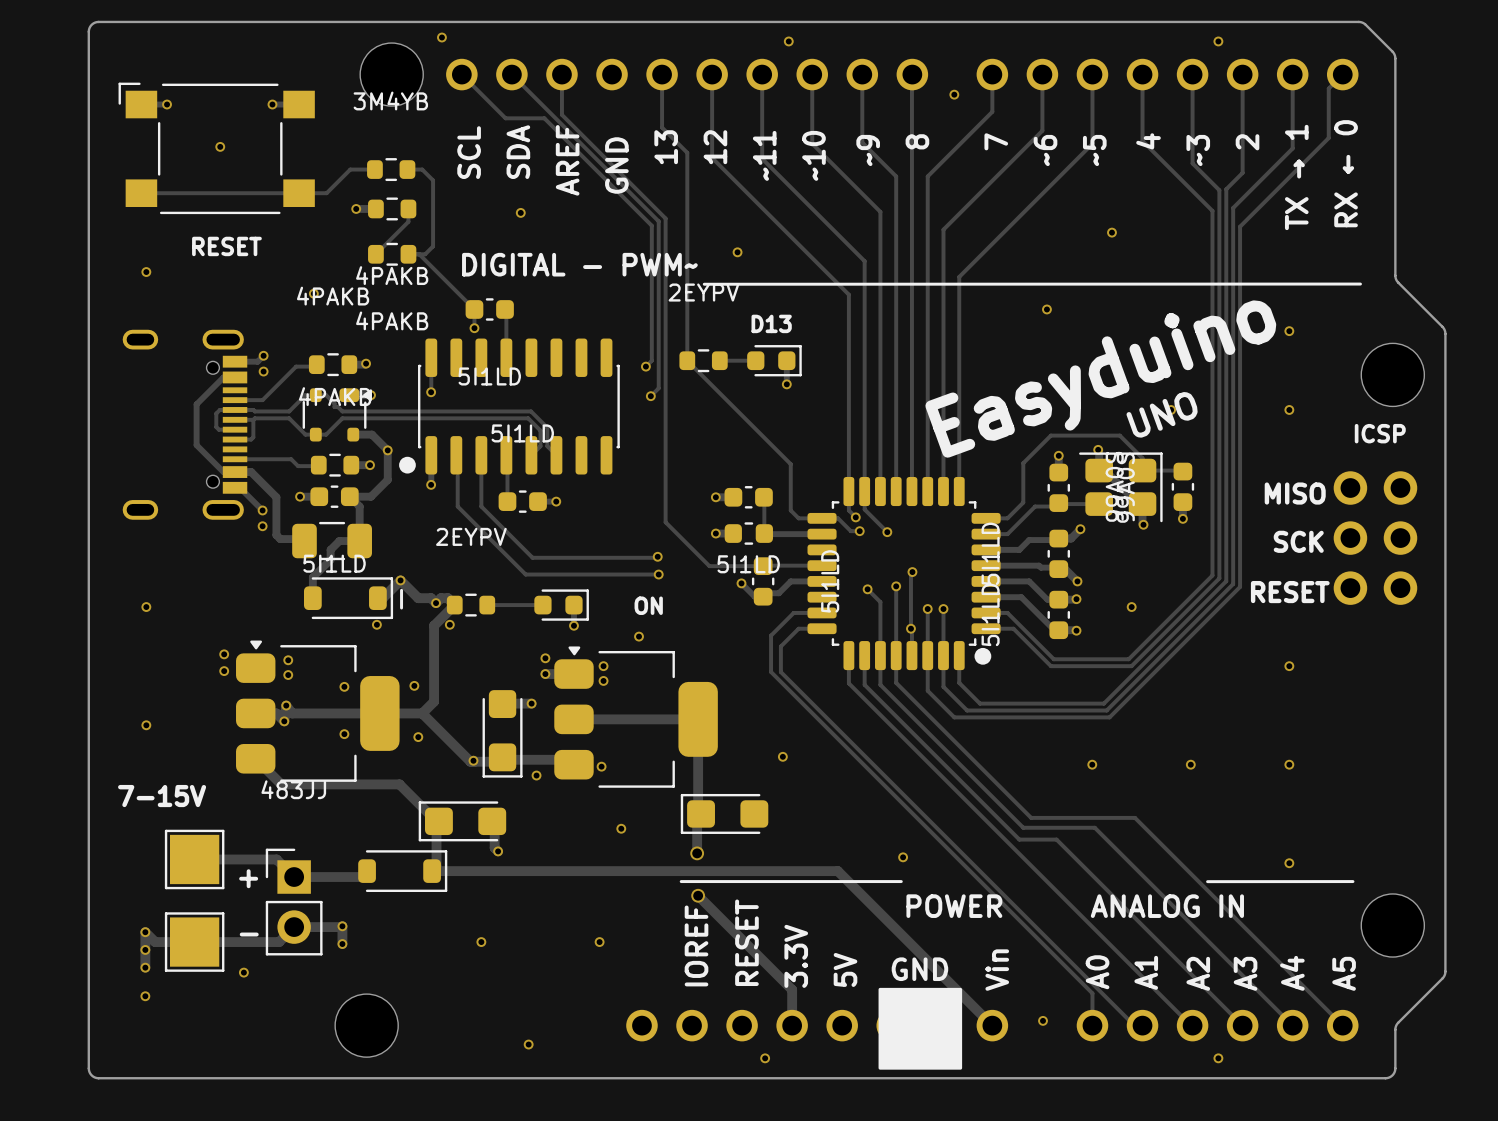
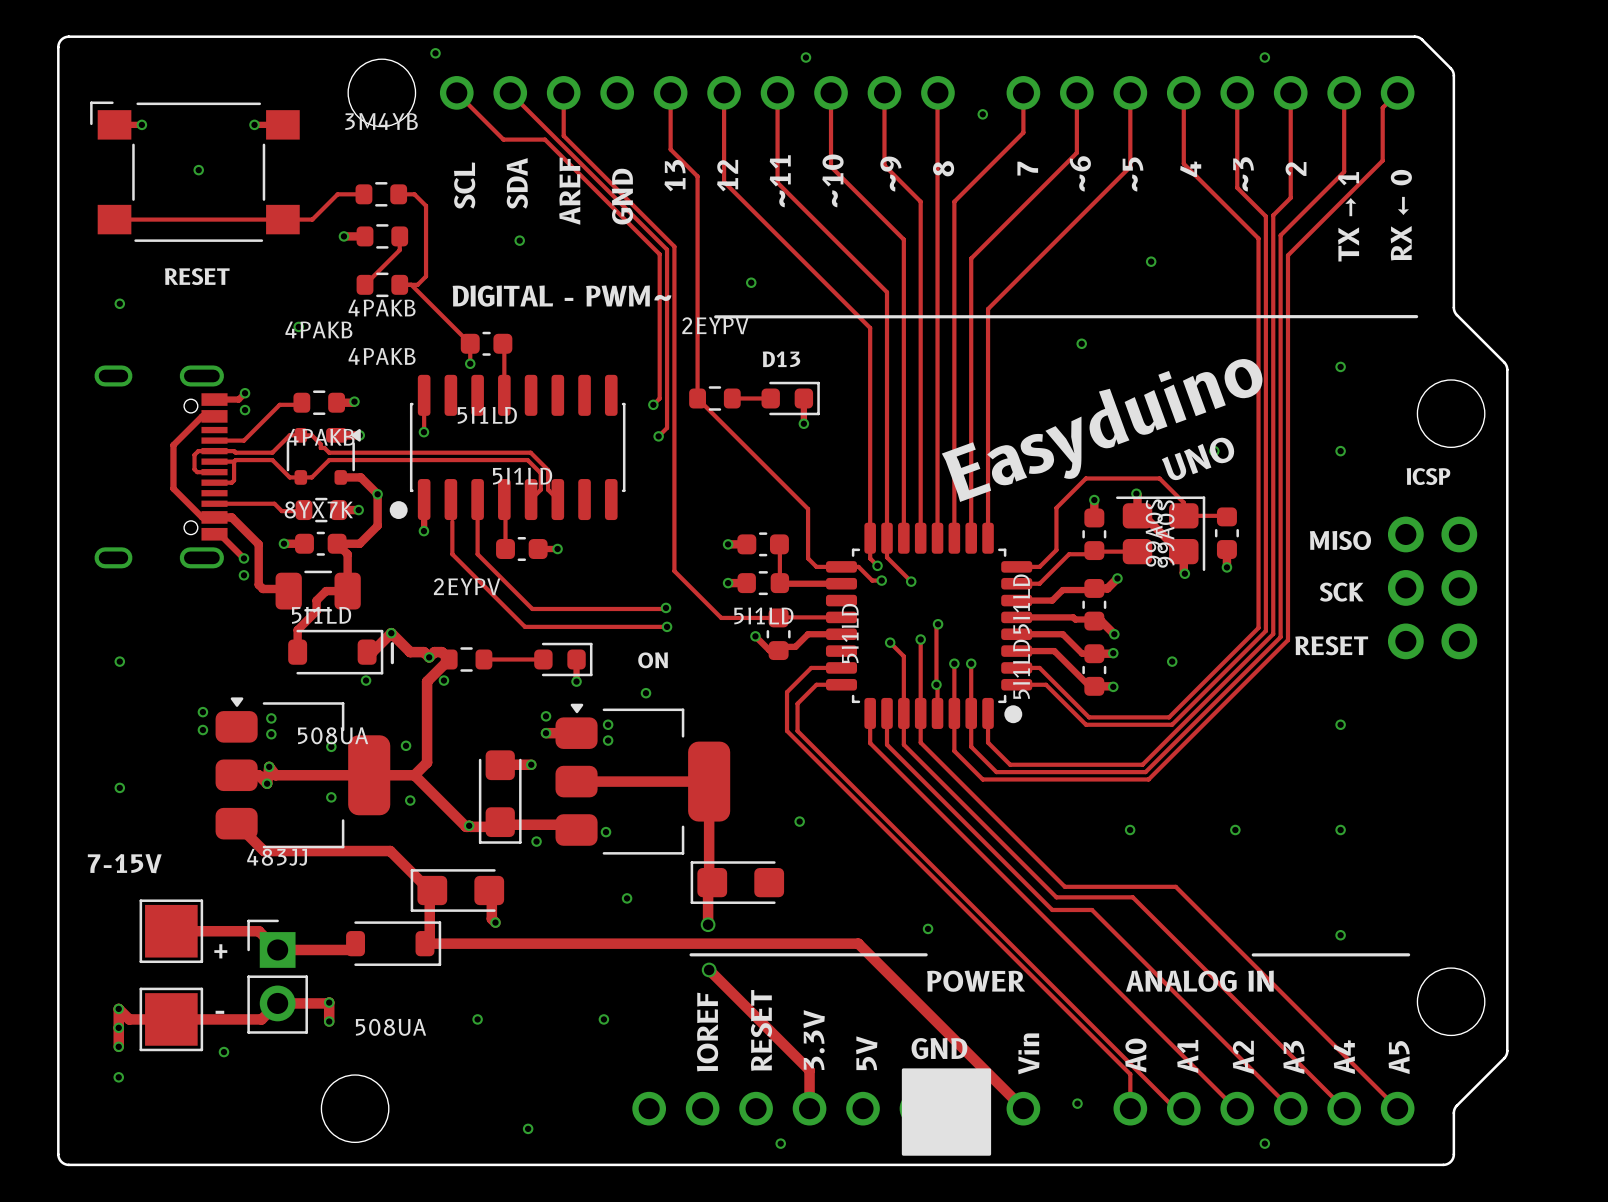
part text: none -> 8YX7K (318, 509)
part text: none -> 508UA (333, 735)
part text: none -> 508UA (391, 1027)

